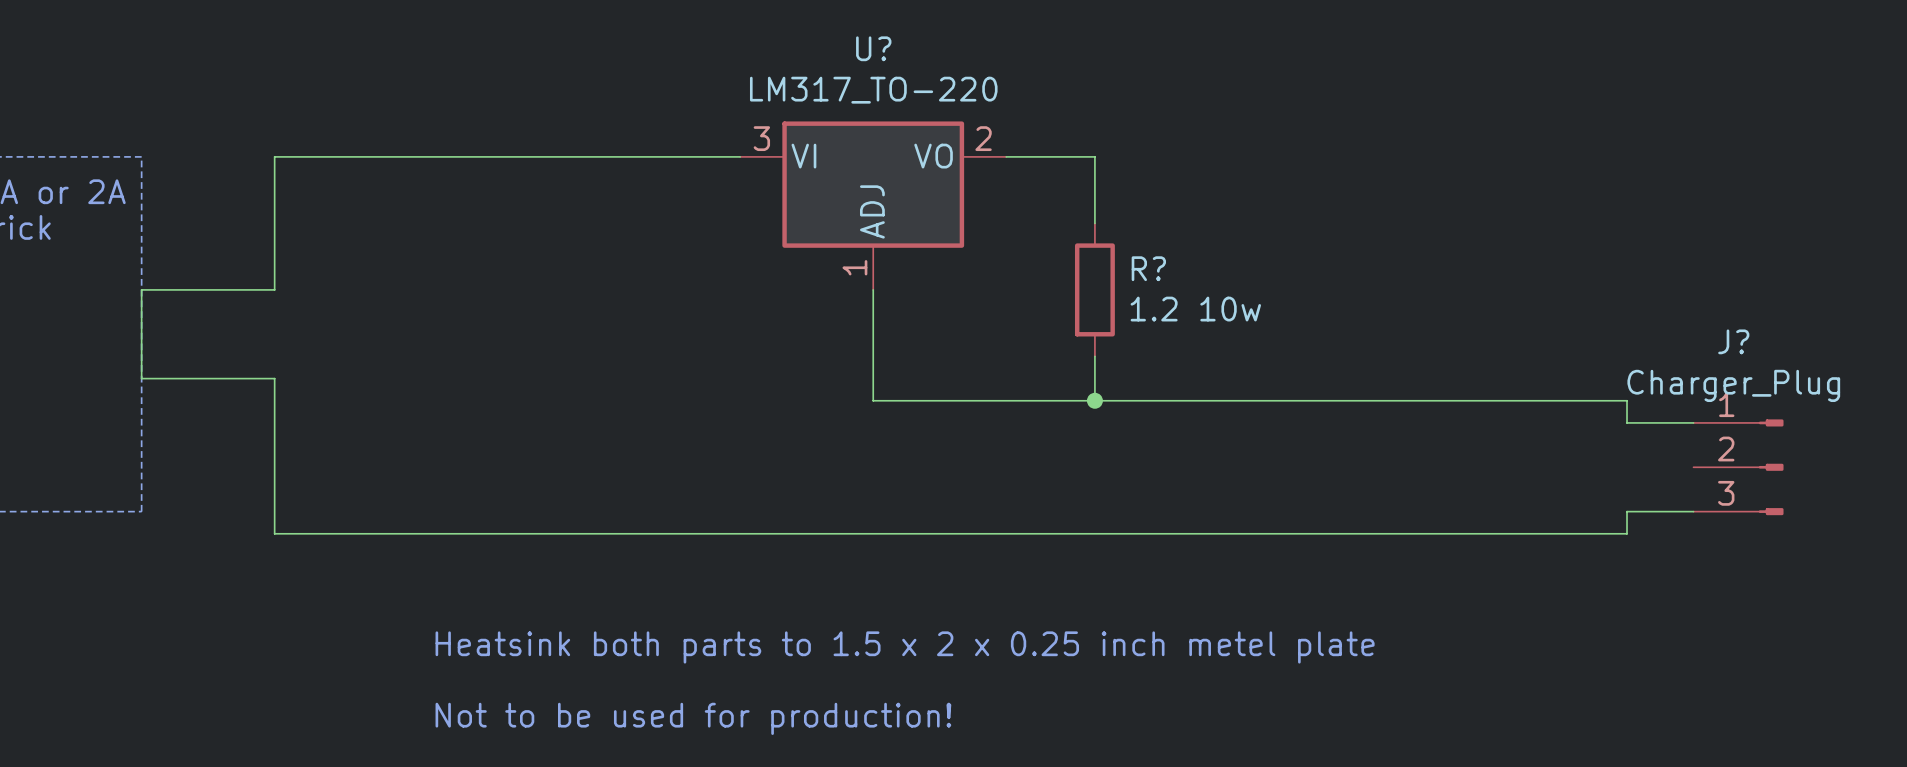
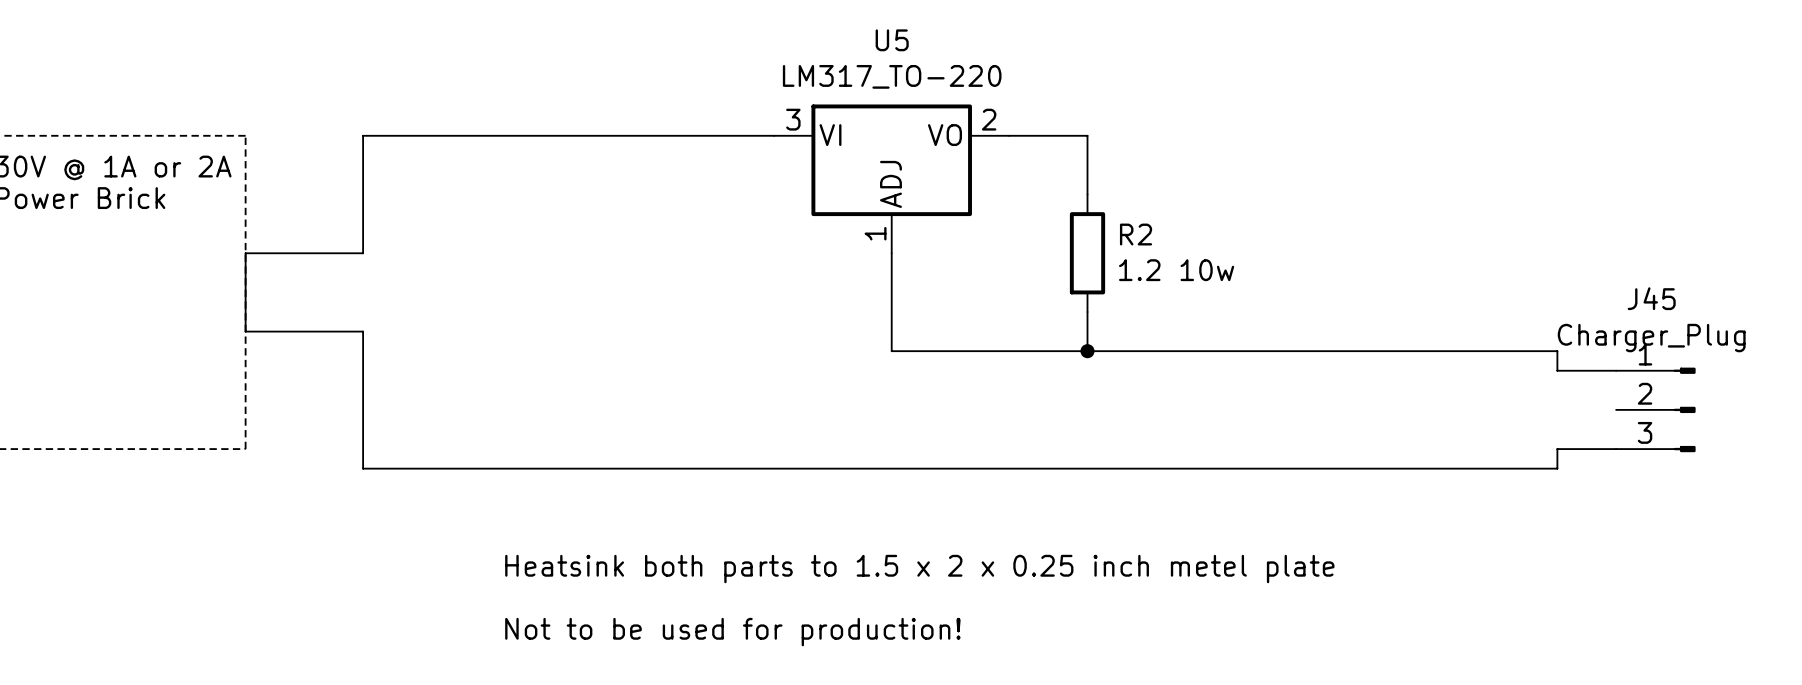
U? name: U? (873, 48) -> U5 (892, 40)
R? name: R? (1148, 268) -> R2 (1136, 234)
J? name: J? (1733, 341) -> J45 (1651, 298)

